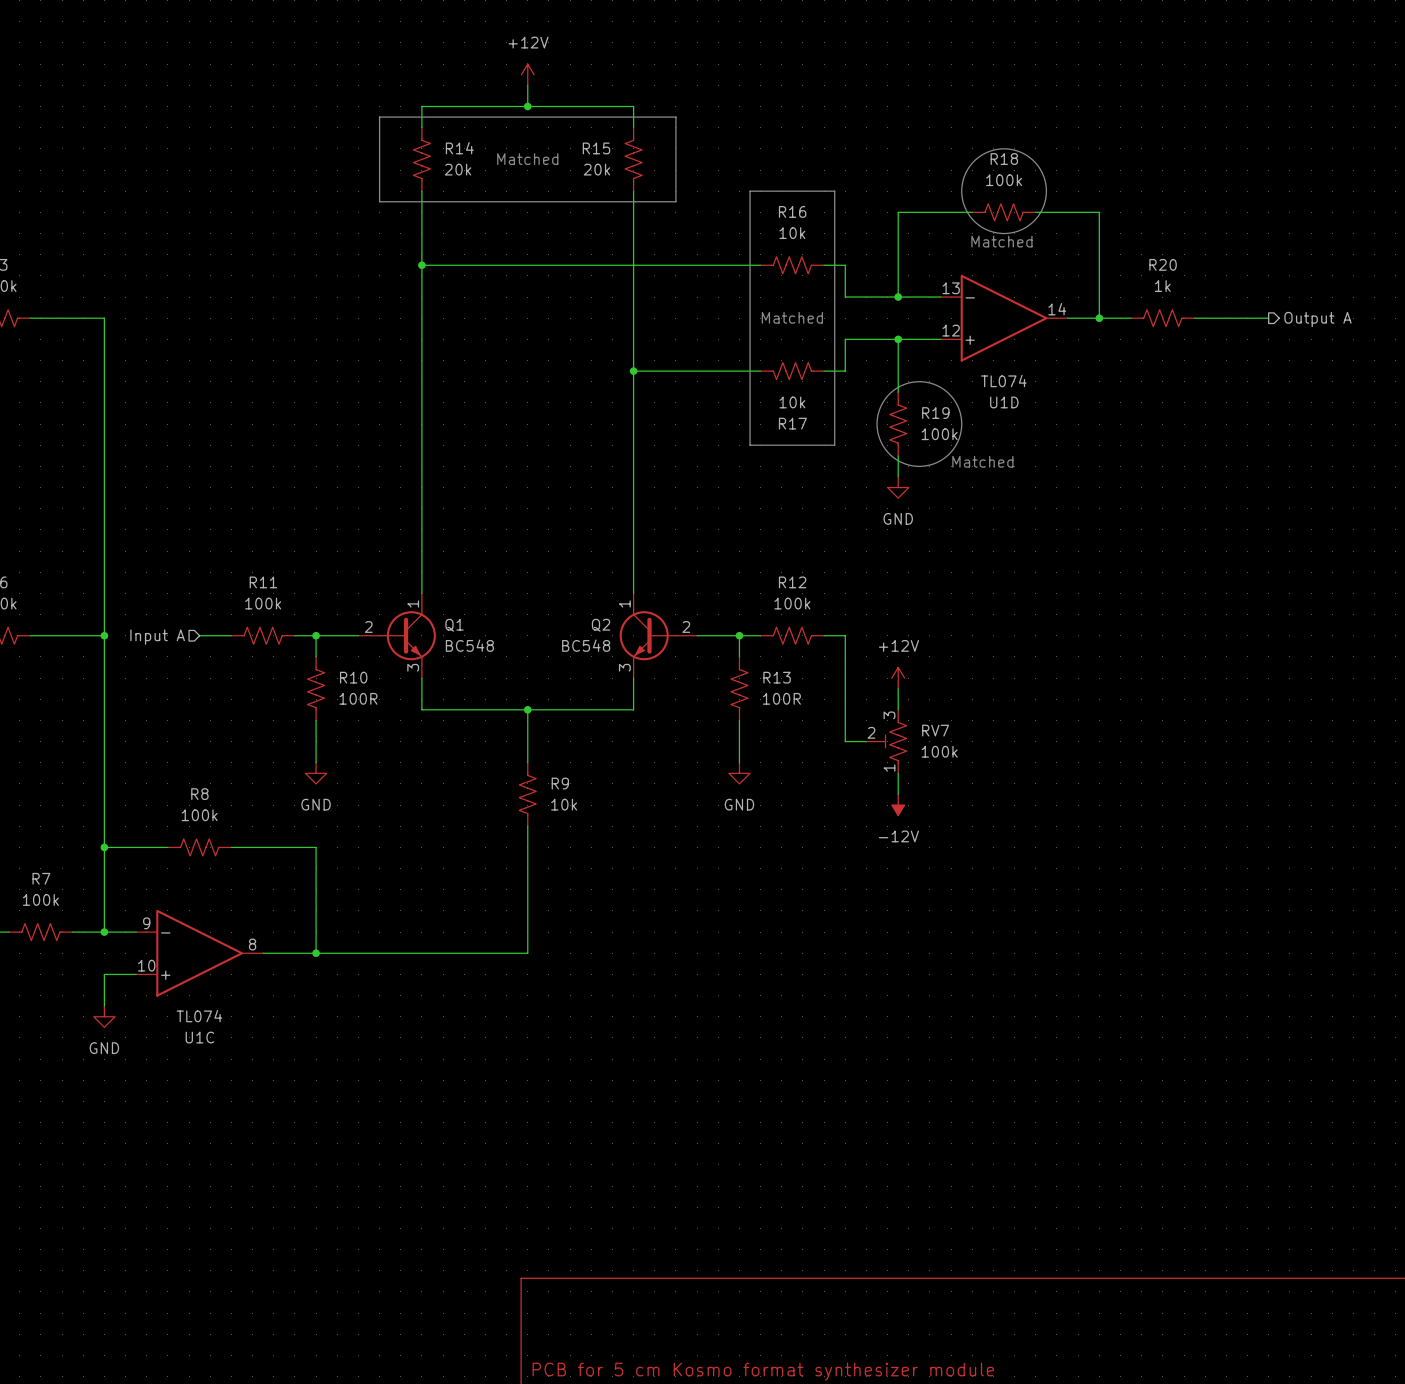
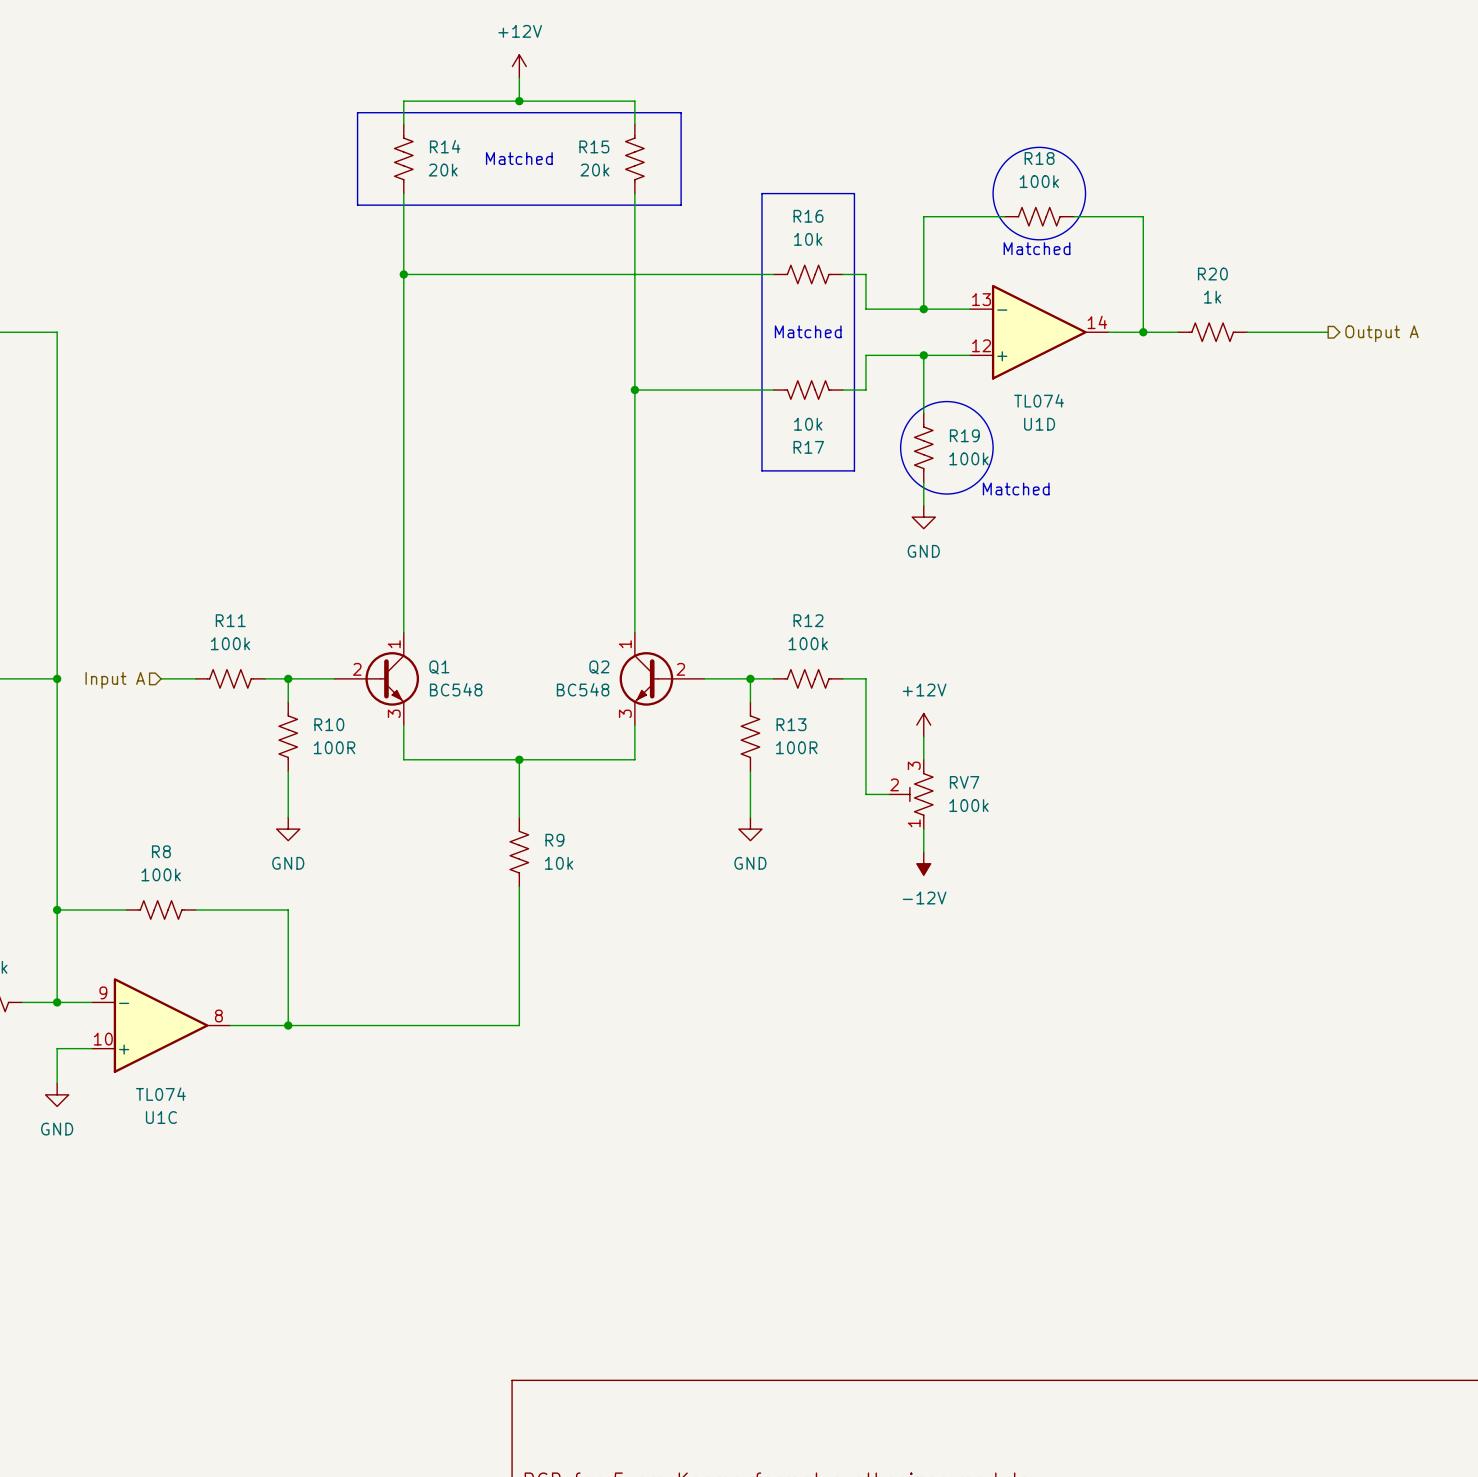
Q1 symbol: [358, 593, 436, 679] -> [334, 632, 420, 726]
Q2 symbol: [619, 593, 698, 679] -> [619, 632, 705, 726]

